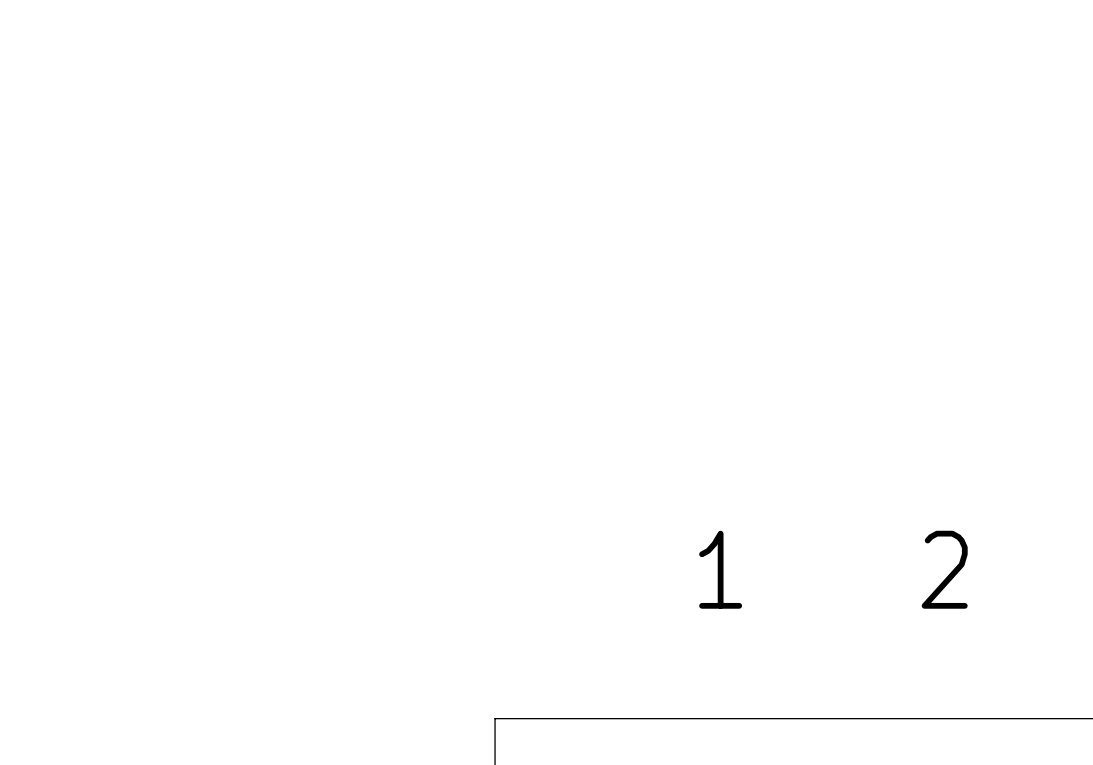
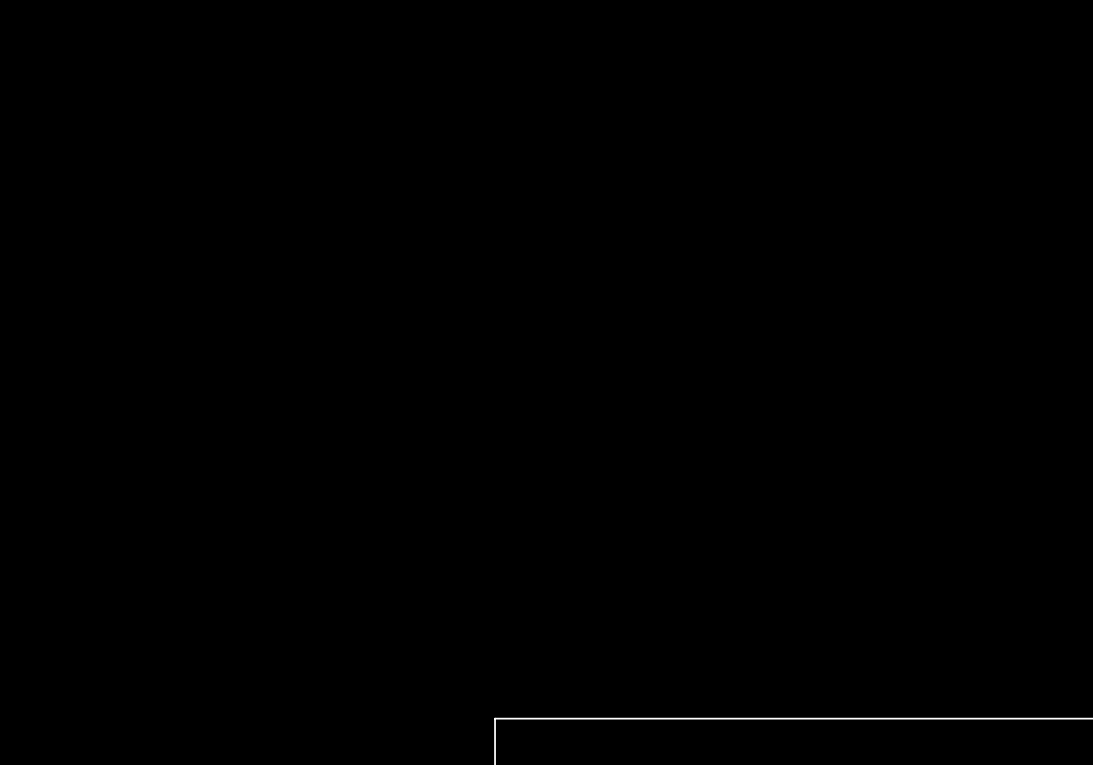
text: 1 (720, 569) -> none
text: 2 (944, 569) -> none

